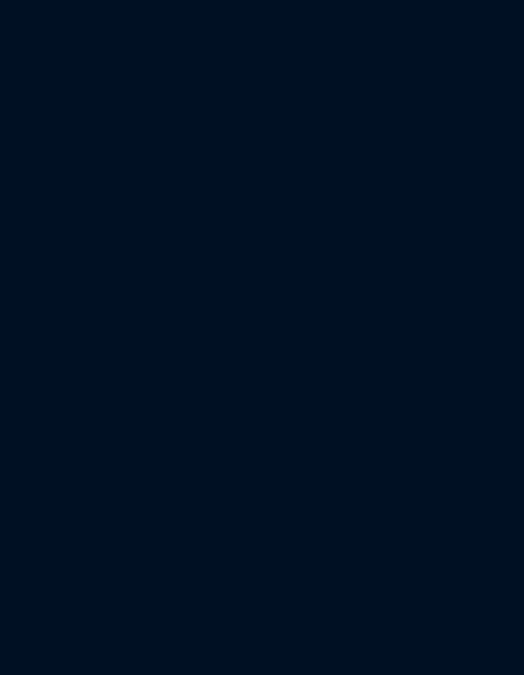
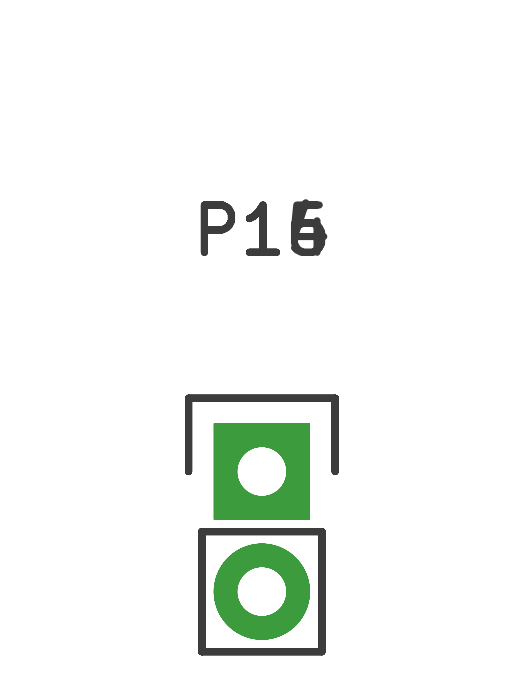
part: none -> (261, 524)
part: none -> (261, 524)
part: none -> (261, 524)

